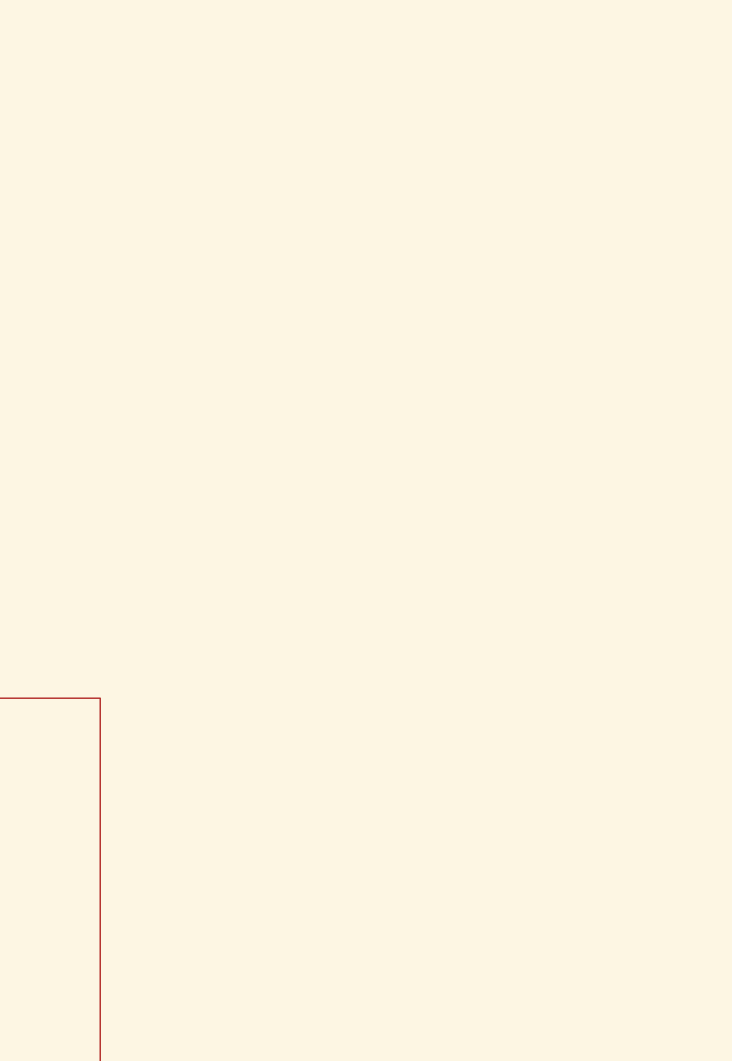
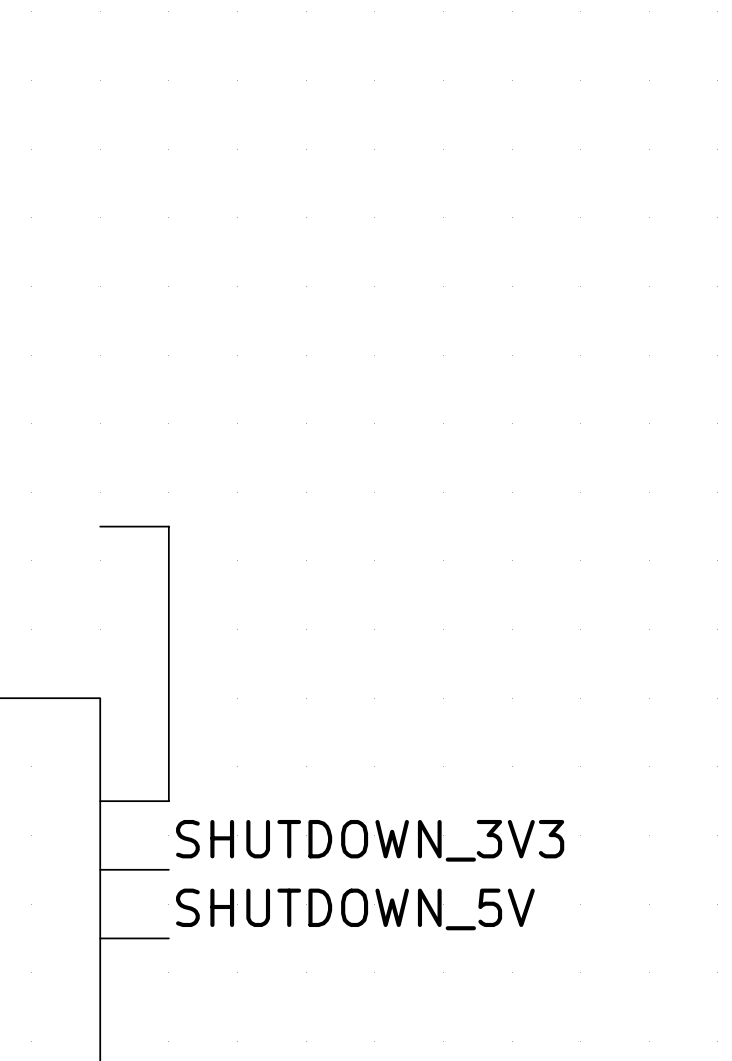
wire: none -> (100, 526) (168, 526) (168, 801) (100, 801)
label: none -> SHUTDOWN_3V3 (370, 840)
wire: none -> (100, 869) (168, 869)
label: none -> SHUTDOWN_5V (355, 909)
wire: none -> (100, 938) (168, 938)

